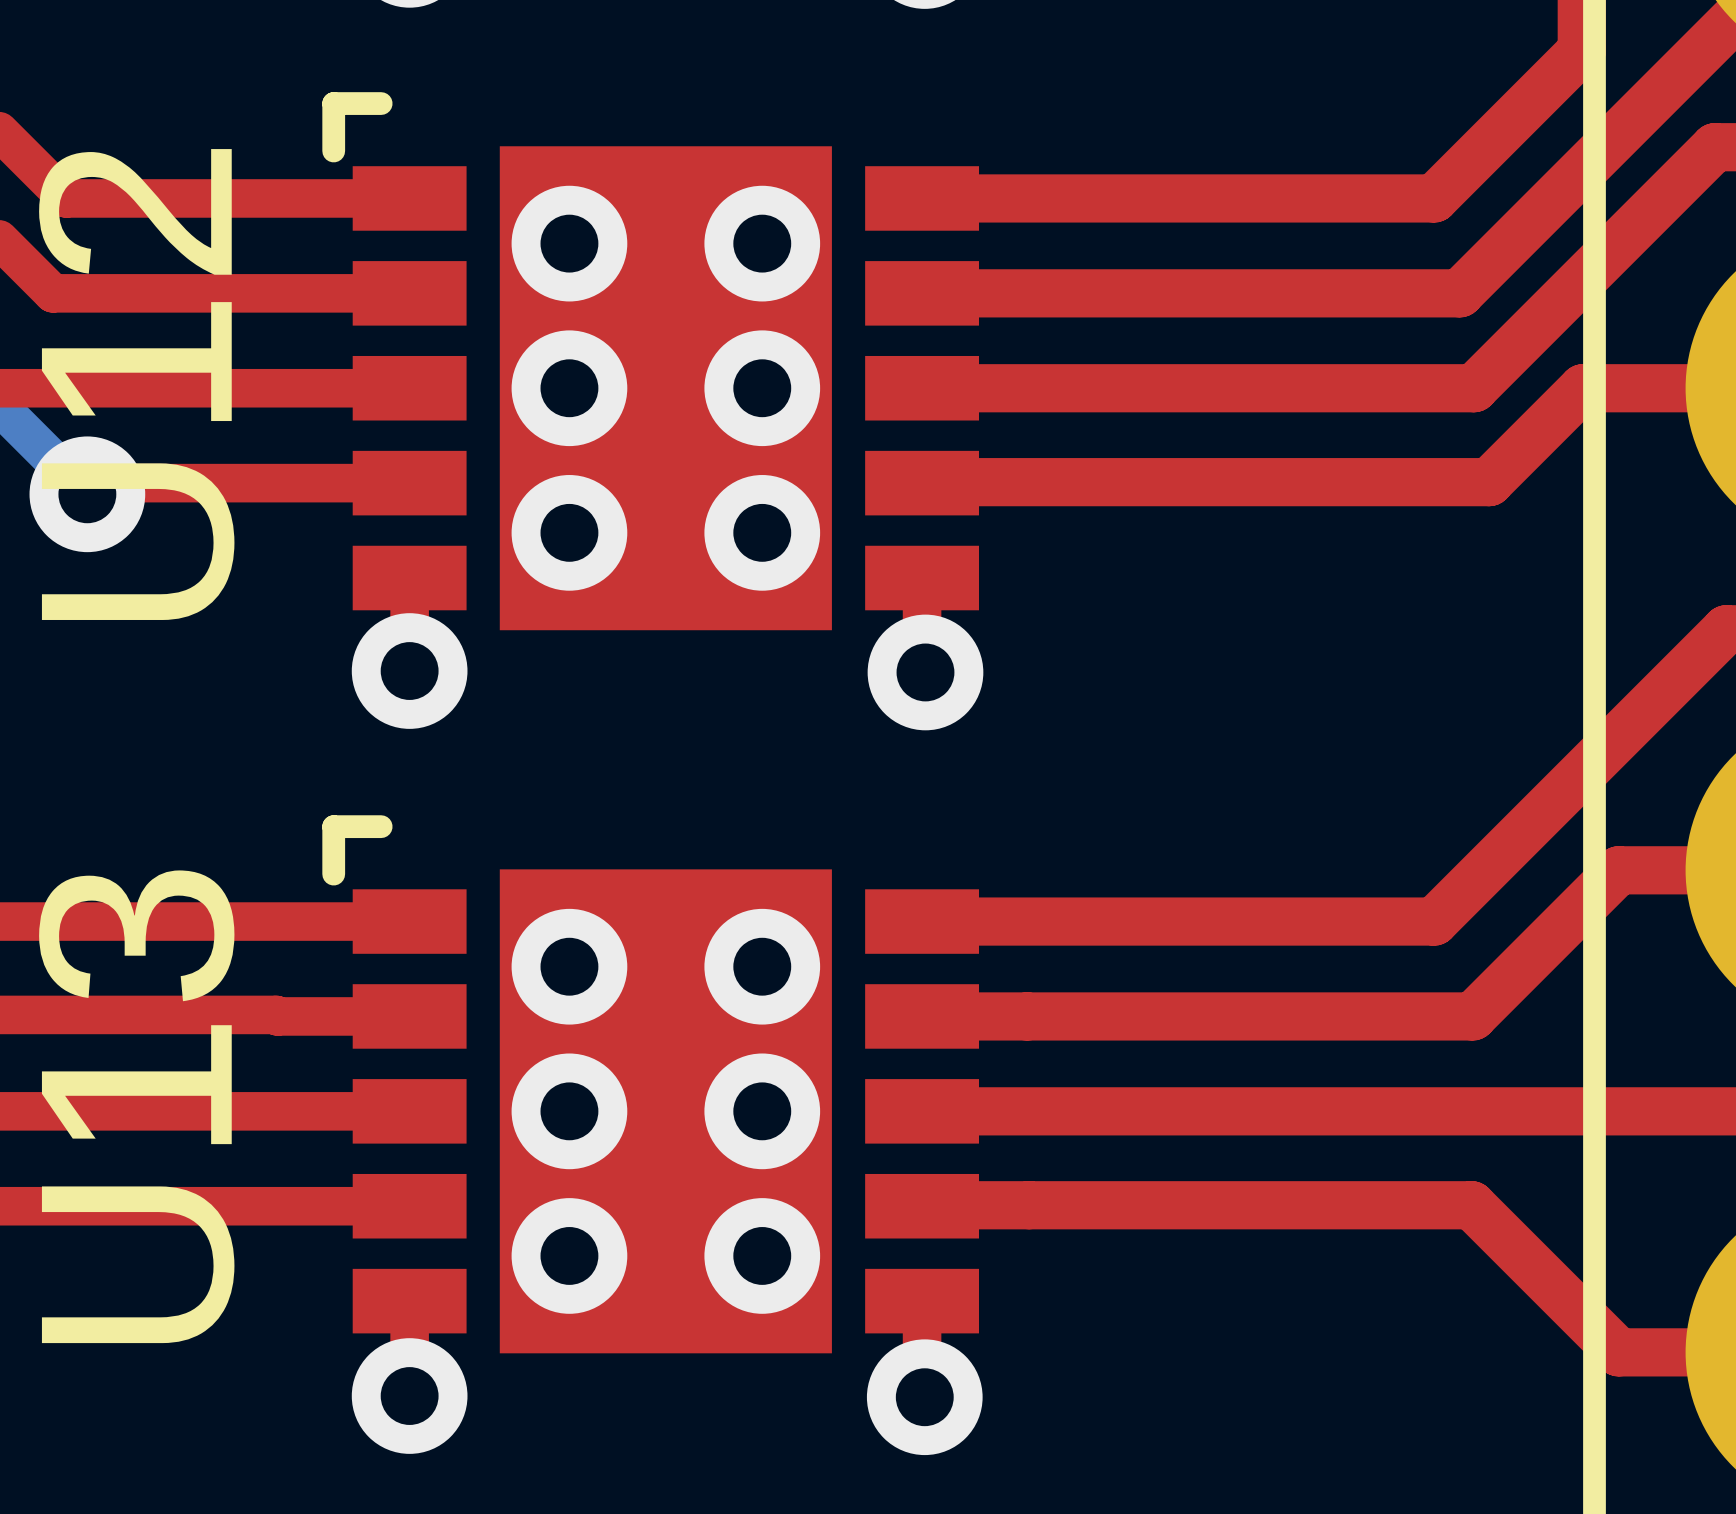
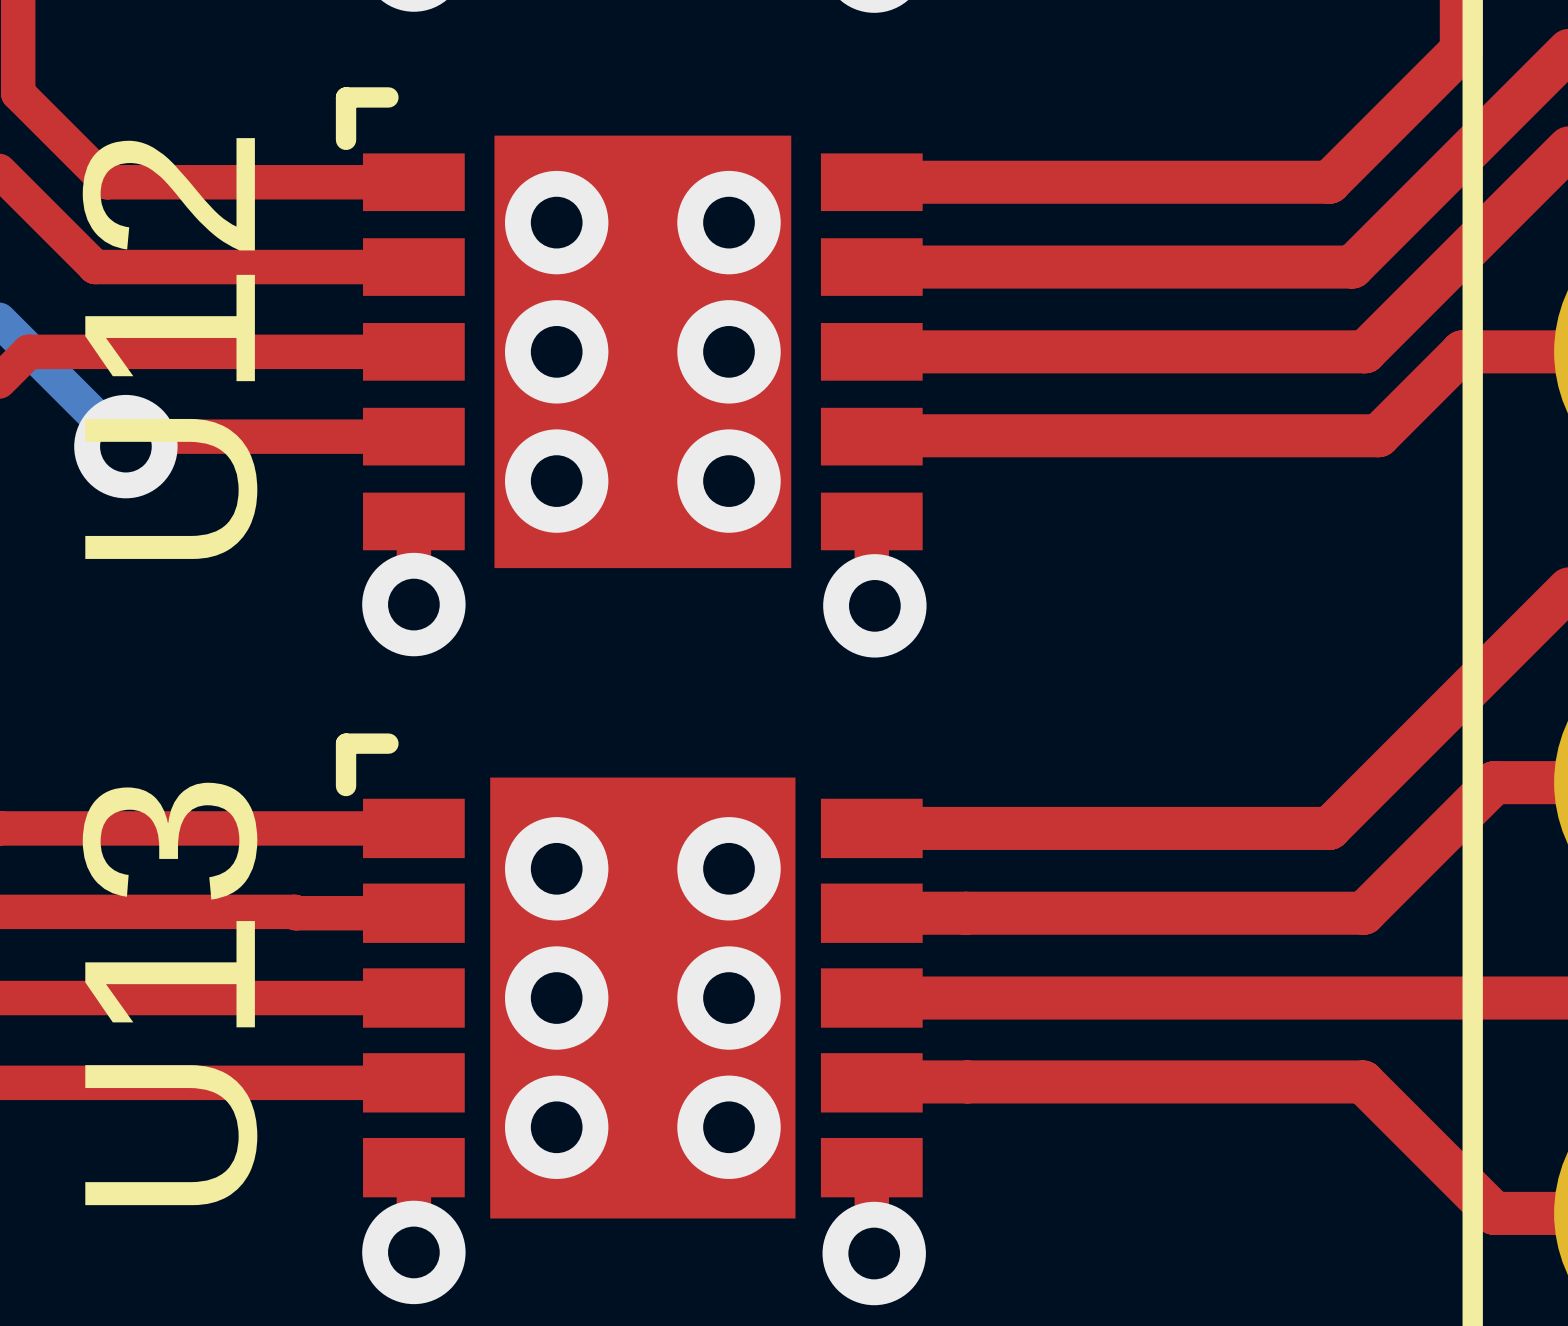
U13 footprint: [322, 815, 980, 1354] -> [335, 733, 923, 1219]

